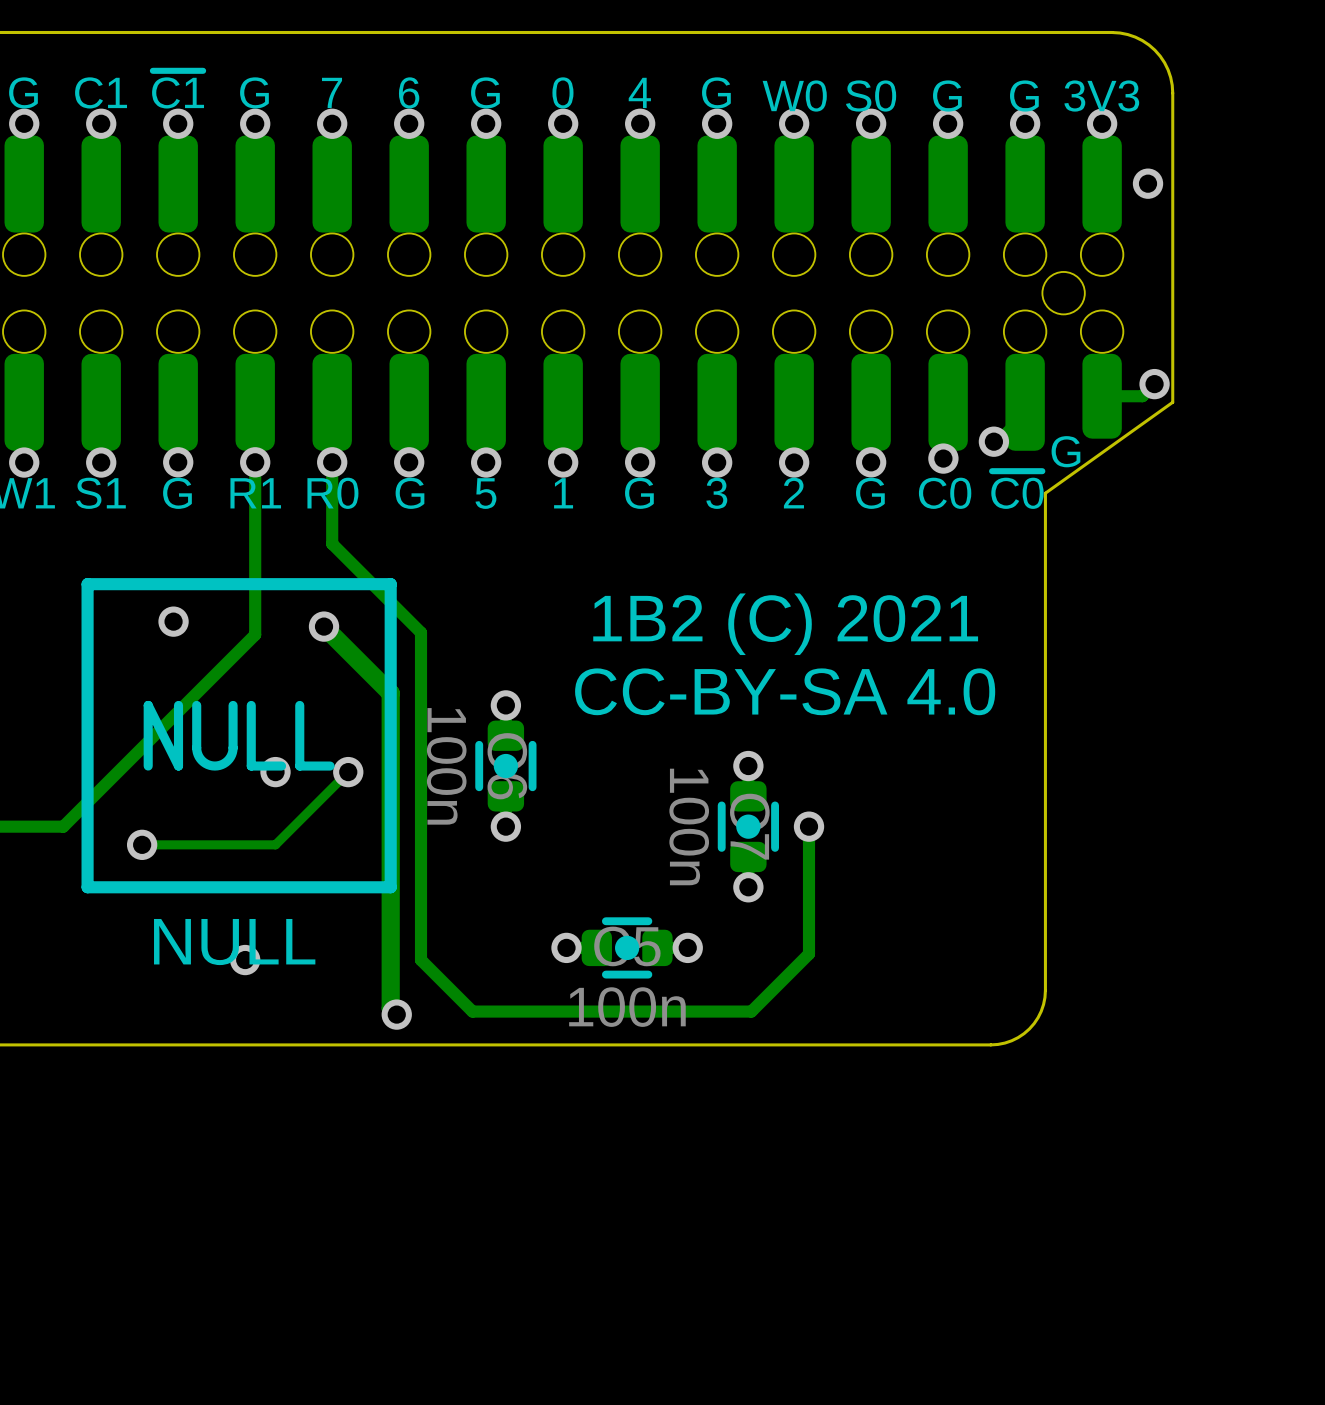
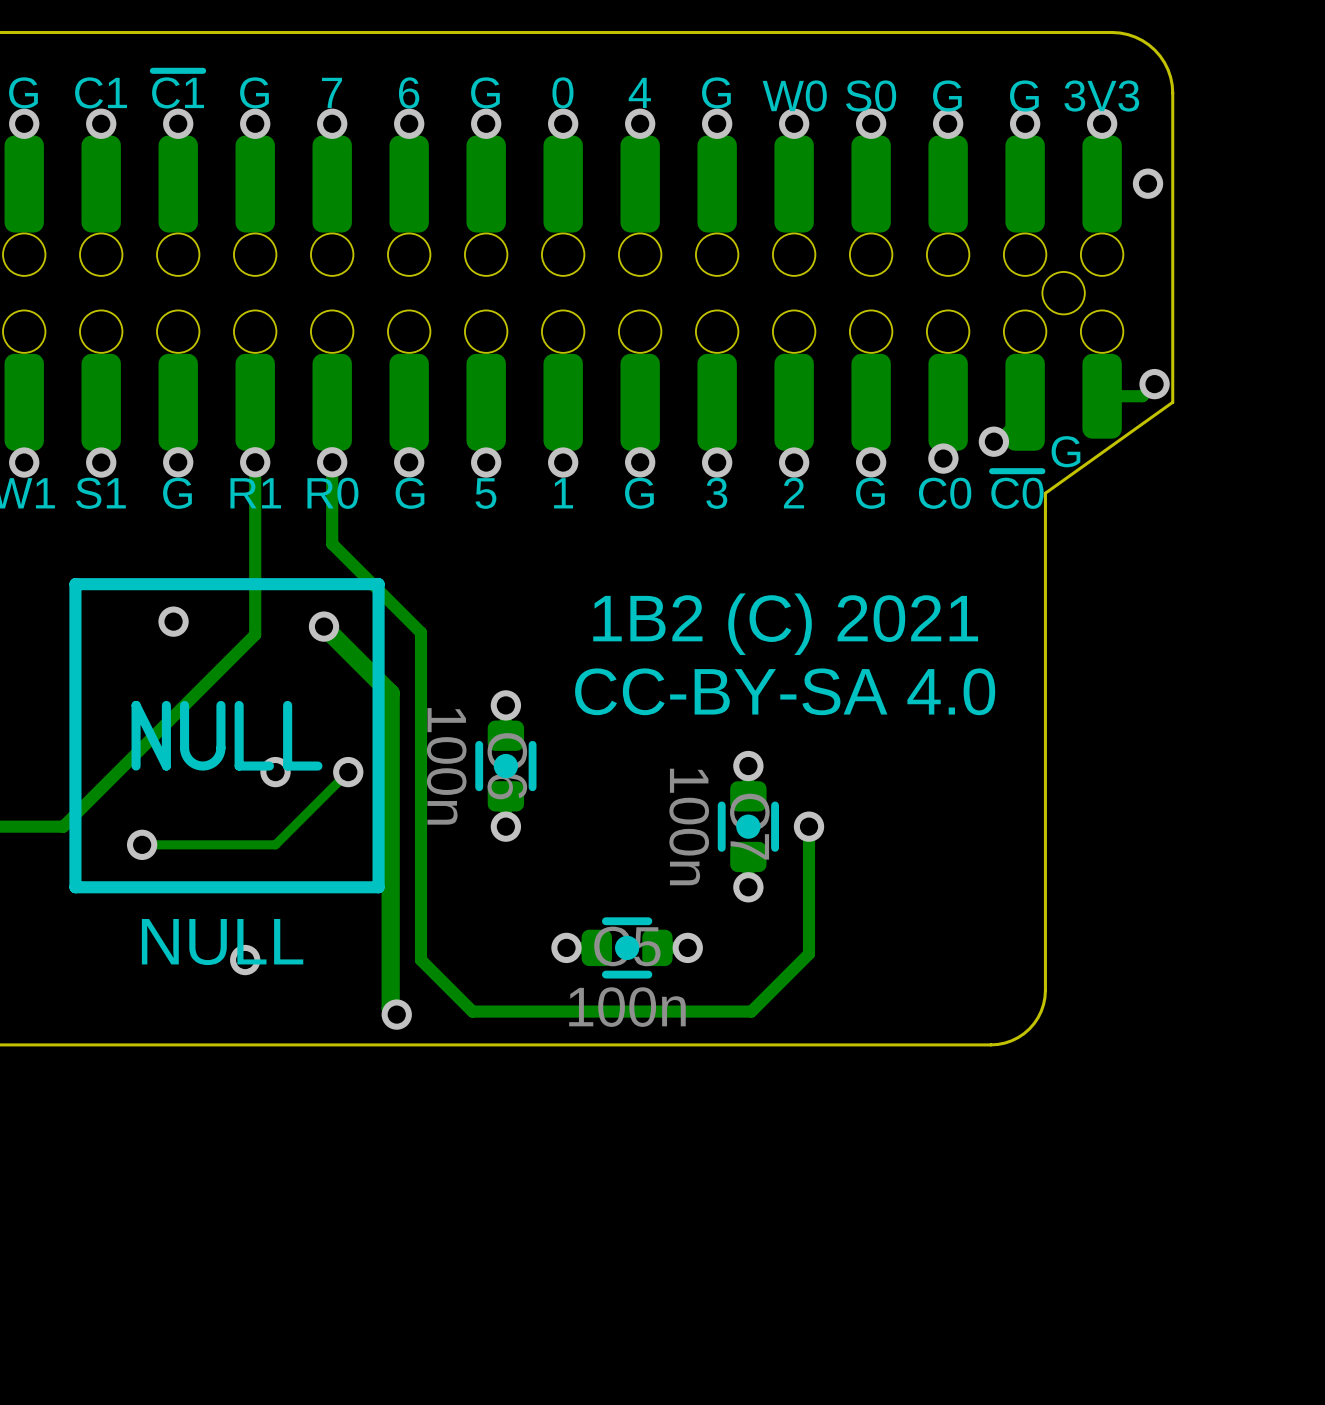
drawing position: (239, 735) -> (227, 735)
text position: NULL (234, 942) -> NULL (222, 942)

